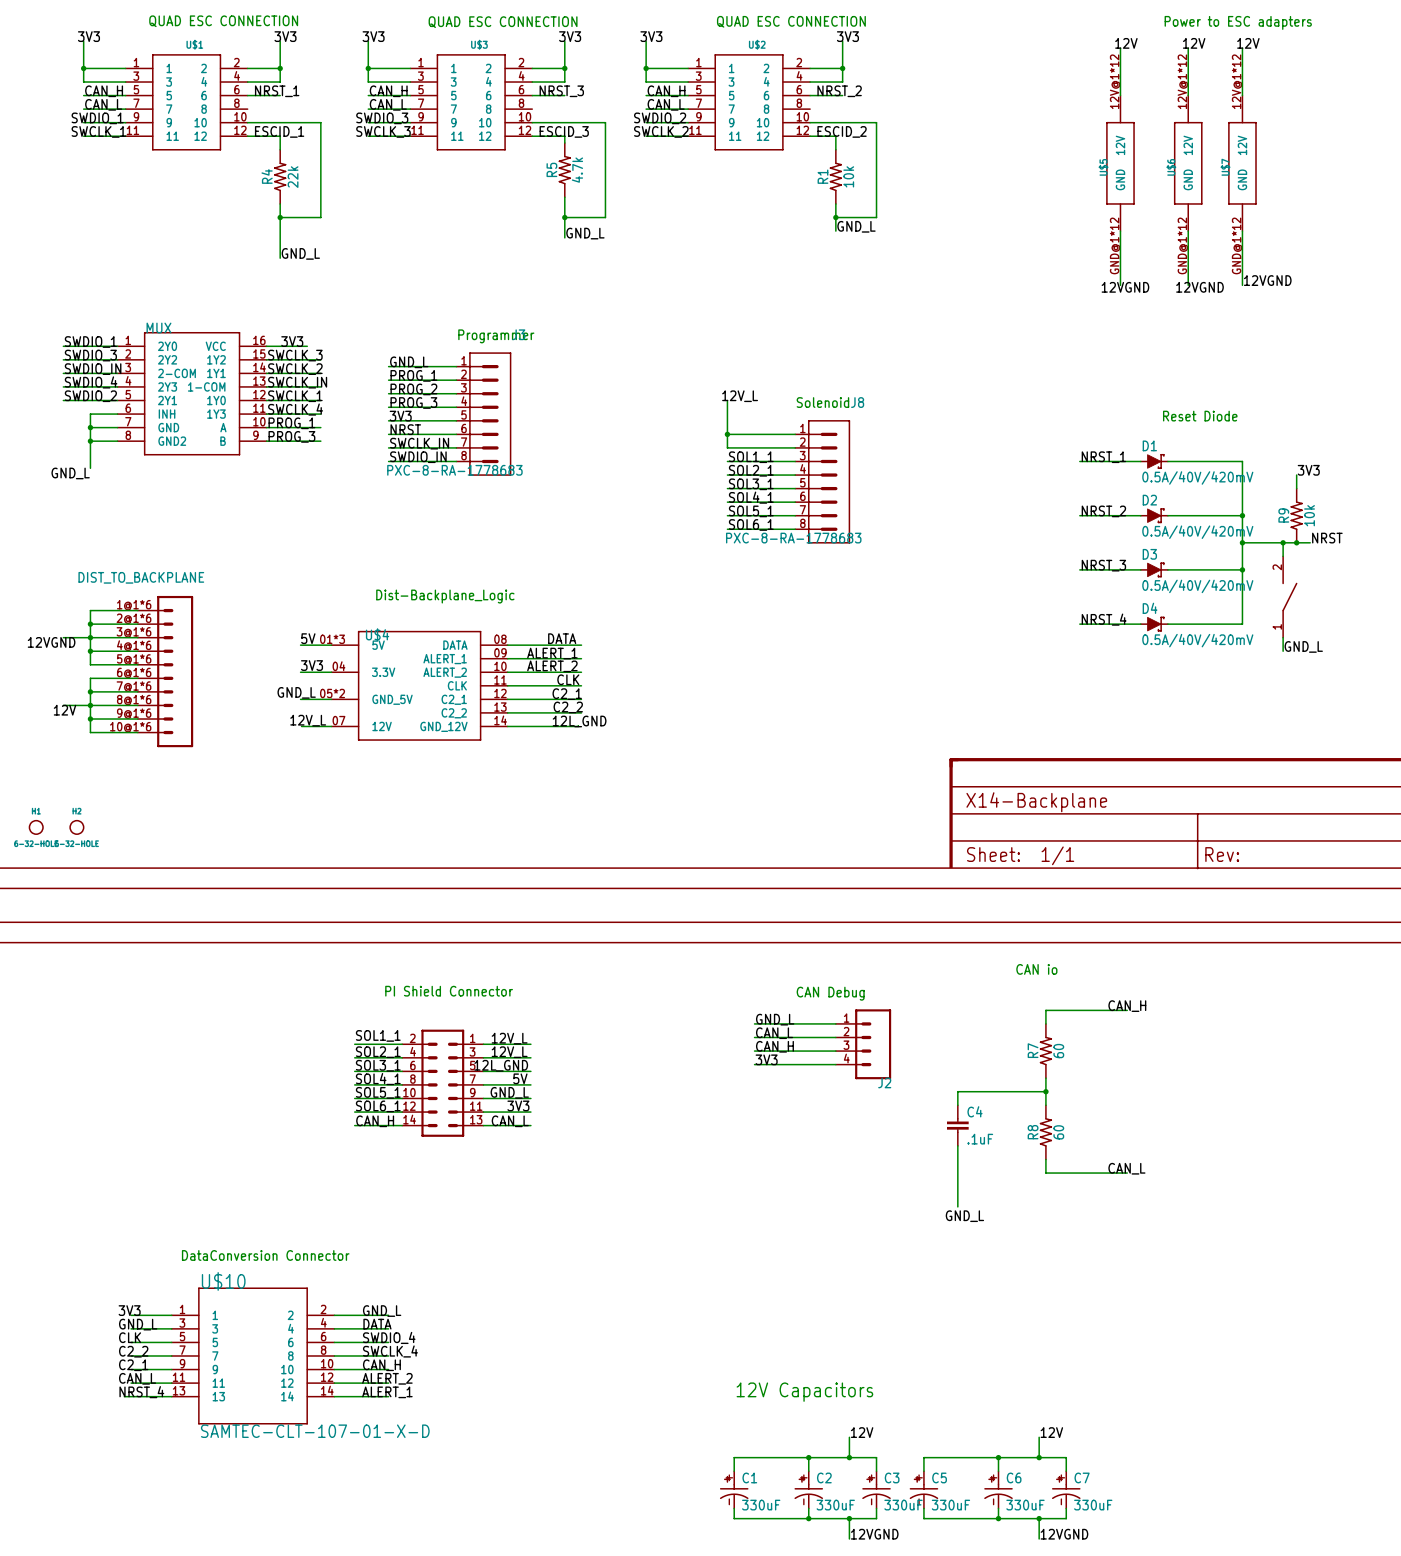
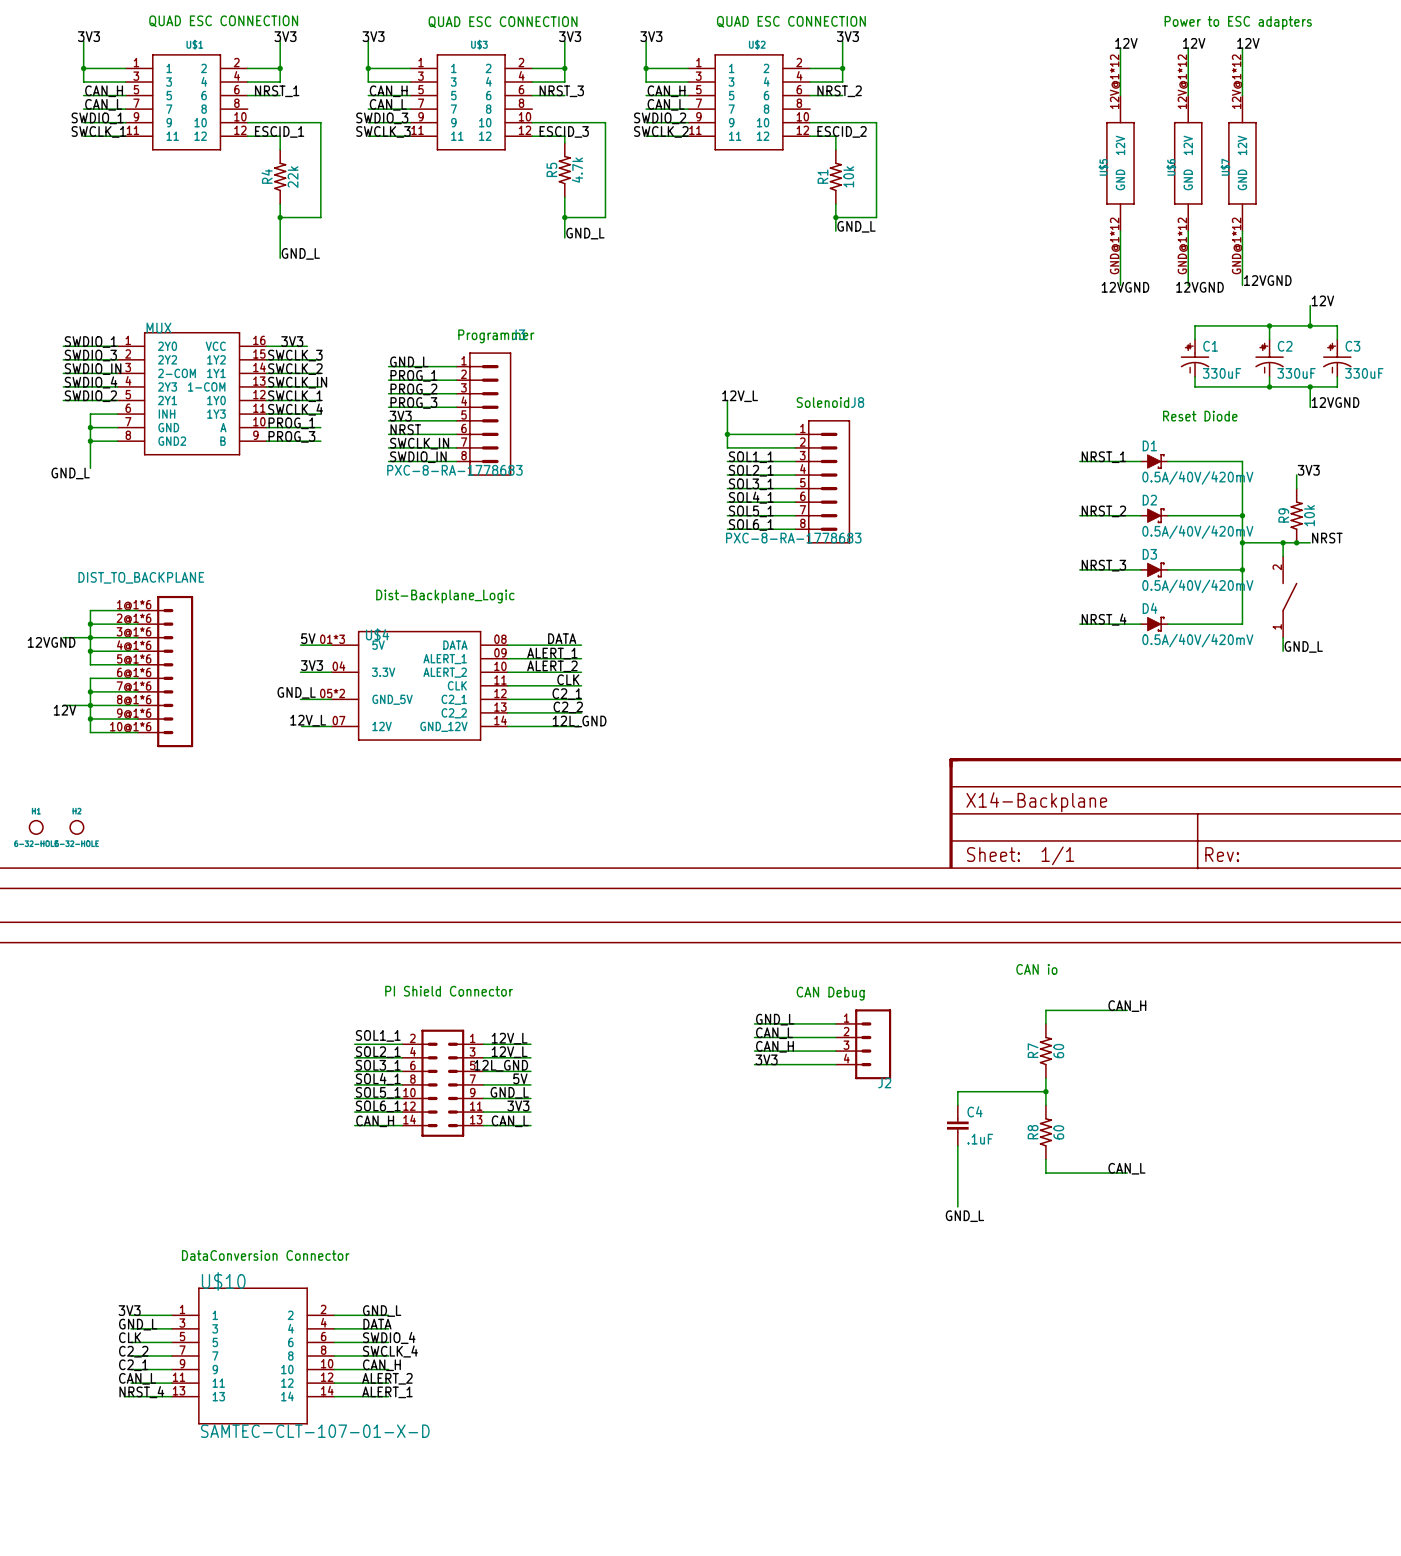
label: none -> 12V (1322, 300)
wire: none -> (1310, 305) (1310, 325)
wire: none -> (1269, 325) (1269, 339)
junction: none -> (1269, 325)
junction: none -> (1310, 325)
wire: none -> (1195, 339) (1195, 325) (1337, 325) (1337, 339)
wire: none -> (1195, 376) (1195, 386) (1337, 386) (1337, 376)
wire: none -> (1269, 376) (1269, 386)
junction: none -> (1269, 386)
wire: none -> (1310, 386) (1310, 407)
junction: none -> (1310, 386)
label: none -> 12VGND (1335, 402)
text: 12V Capacitors (804, 1392) -> none
label: 12V (862, 1432) -> none
label: 12V (1051, 1432) -> none
wire: (849, 1437) (849, 1457) -> none
wire: (1039, 1437) (1039, 1457) -> none
wire: (808, 1457) (808, 1471) -> none
junction: (808, 1457) -> none
junction: (849, 1457) -> none
wire: (998, 1457) (998, 1471) -> none
junction: (998, 1457) -> none
junction: (1039, 1457) -> none
wire: (734, 1471) (734, 1457) (876, 1457) (876, 1471) -> none
wire: (923, 1471) (923, 1457) (1066, 1457) (1066, 1471) -> none
C1 position: (734, 1489) -> (1195, 358)
C2 position: (808, 1489) -> (1269, 358)
C3 position: (876, 1489) -> (1337, 358)
C5: 330uF (923, 1489) -> none
C6: 330uF (998, 1489) -> none
C7: 330uF (1066, 1489) -> none
wire: (734, 1508) (734, 1518) (876, 1518) (876, 1508) -> none
wire: (808, 1508) (808, 1518) -> none
wire: (923, 1508) (923, 1518) (1066, 1518) (1066, 1508) -> none
wire: (998, 1508) (998, 1518) -> none
junction: (808, 1518) -> none
wire: (849, 1518) (849, 1538) -> none
junction: (849, 1518) -> none
junction: (998, 1518) -> none
wire: (1039, 1518) (1039, 1538) -> none
junction: (1039, 1518) -> none
label: 12VGND (874, 1534) -> none
label: 12VGND (1064, 1534) -> none

